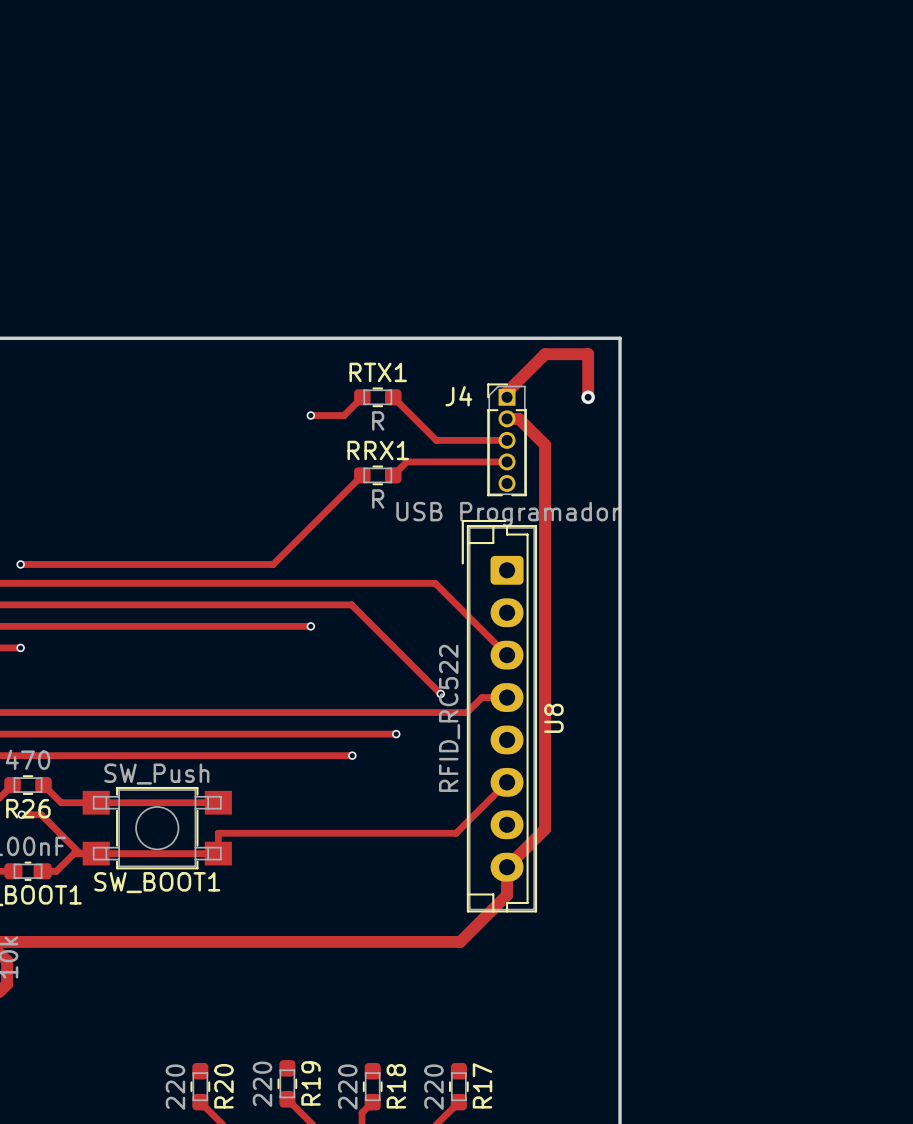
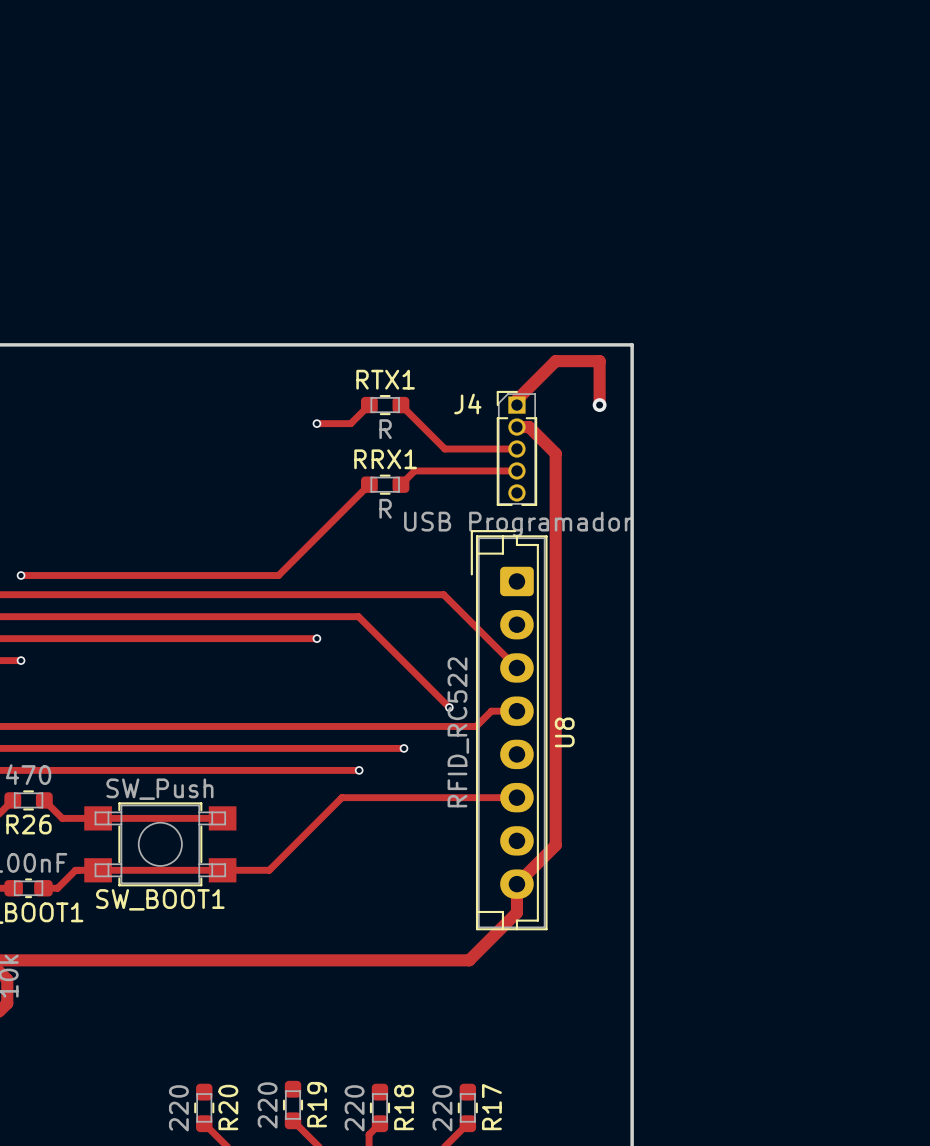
track: (507, 782) (456, 833) (218, 833) (218, 853) -> (516, 797) (341, 797) (269, 870) (222, 870)
track: (21, 814) (41, 814) (80, 853) -> none
via: (21, 814) -> none

